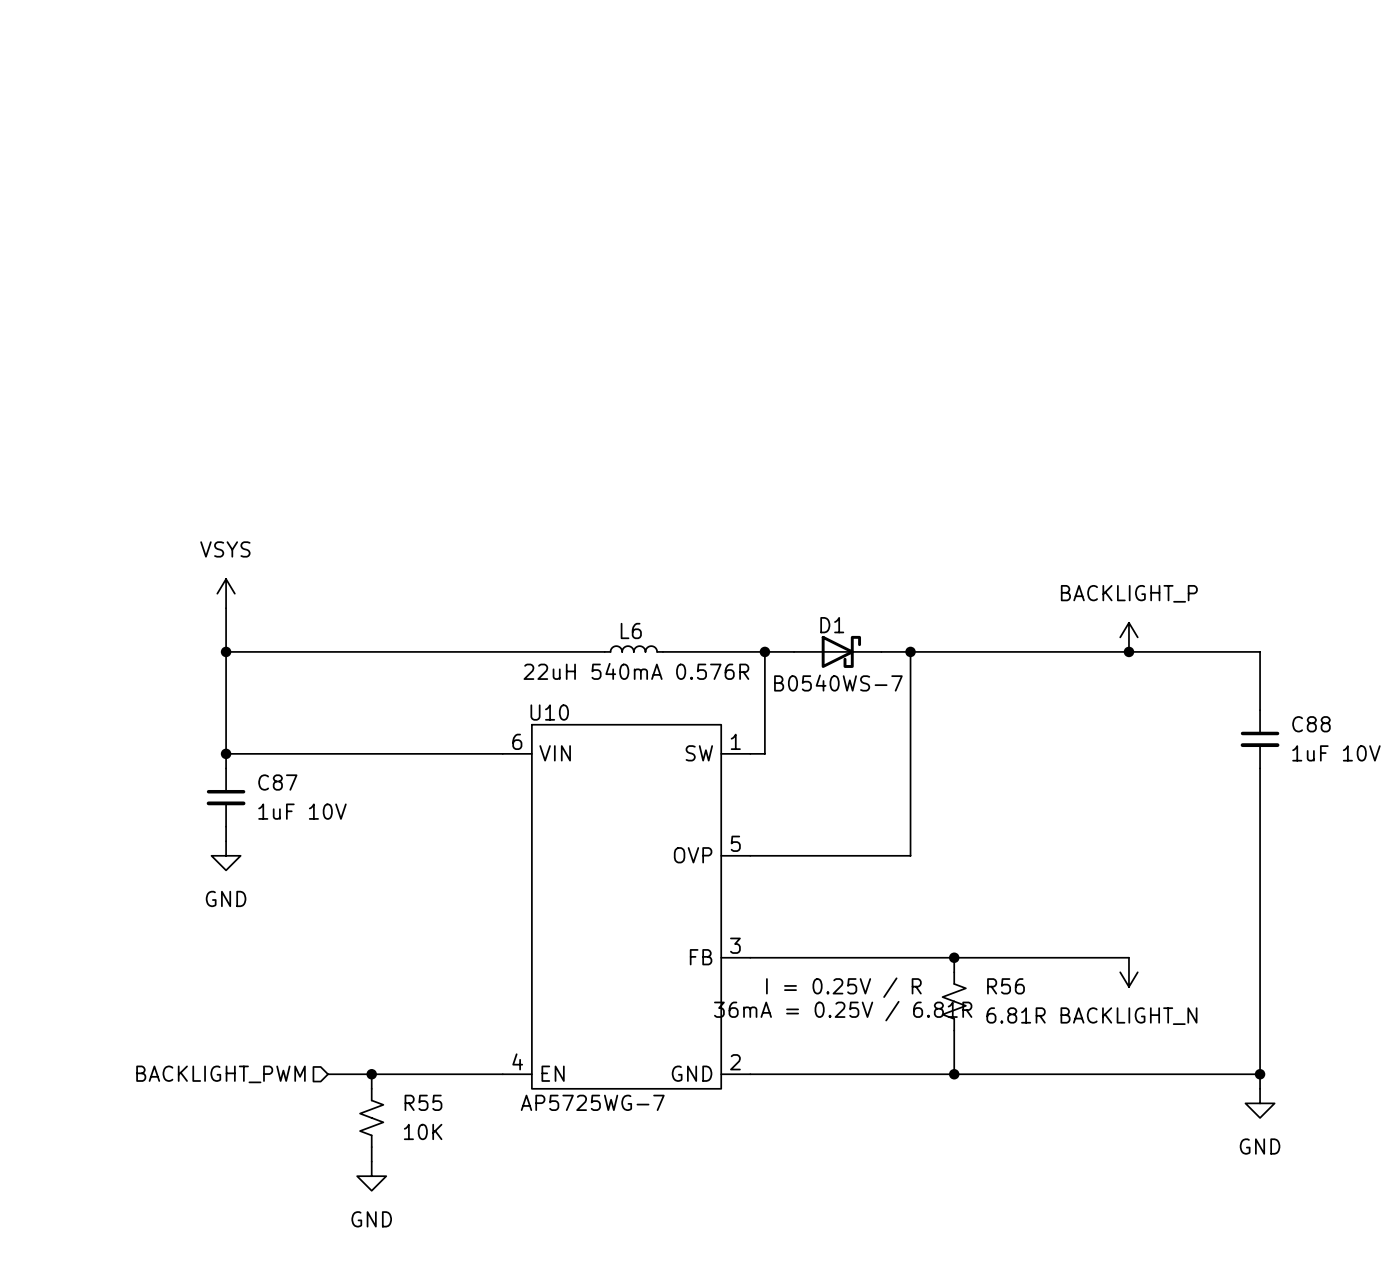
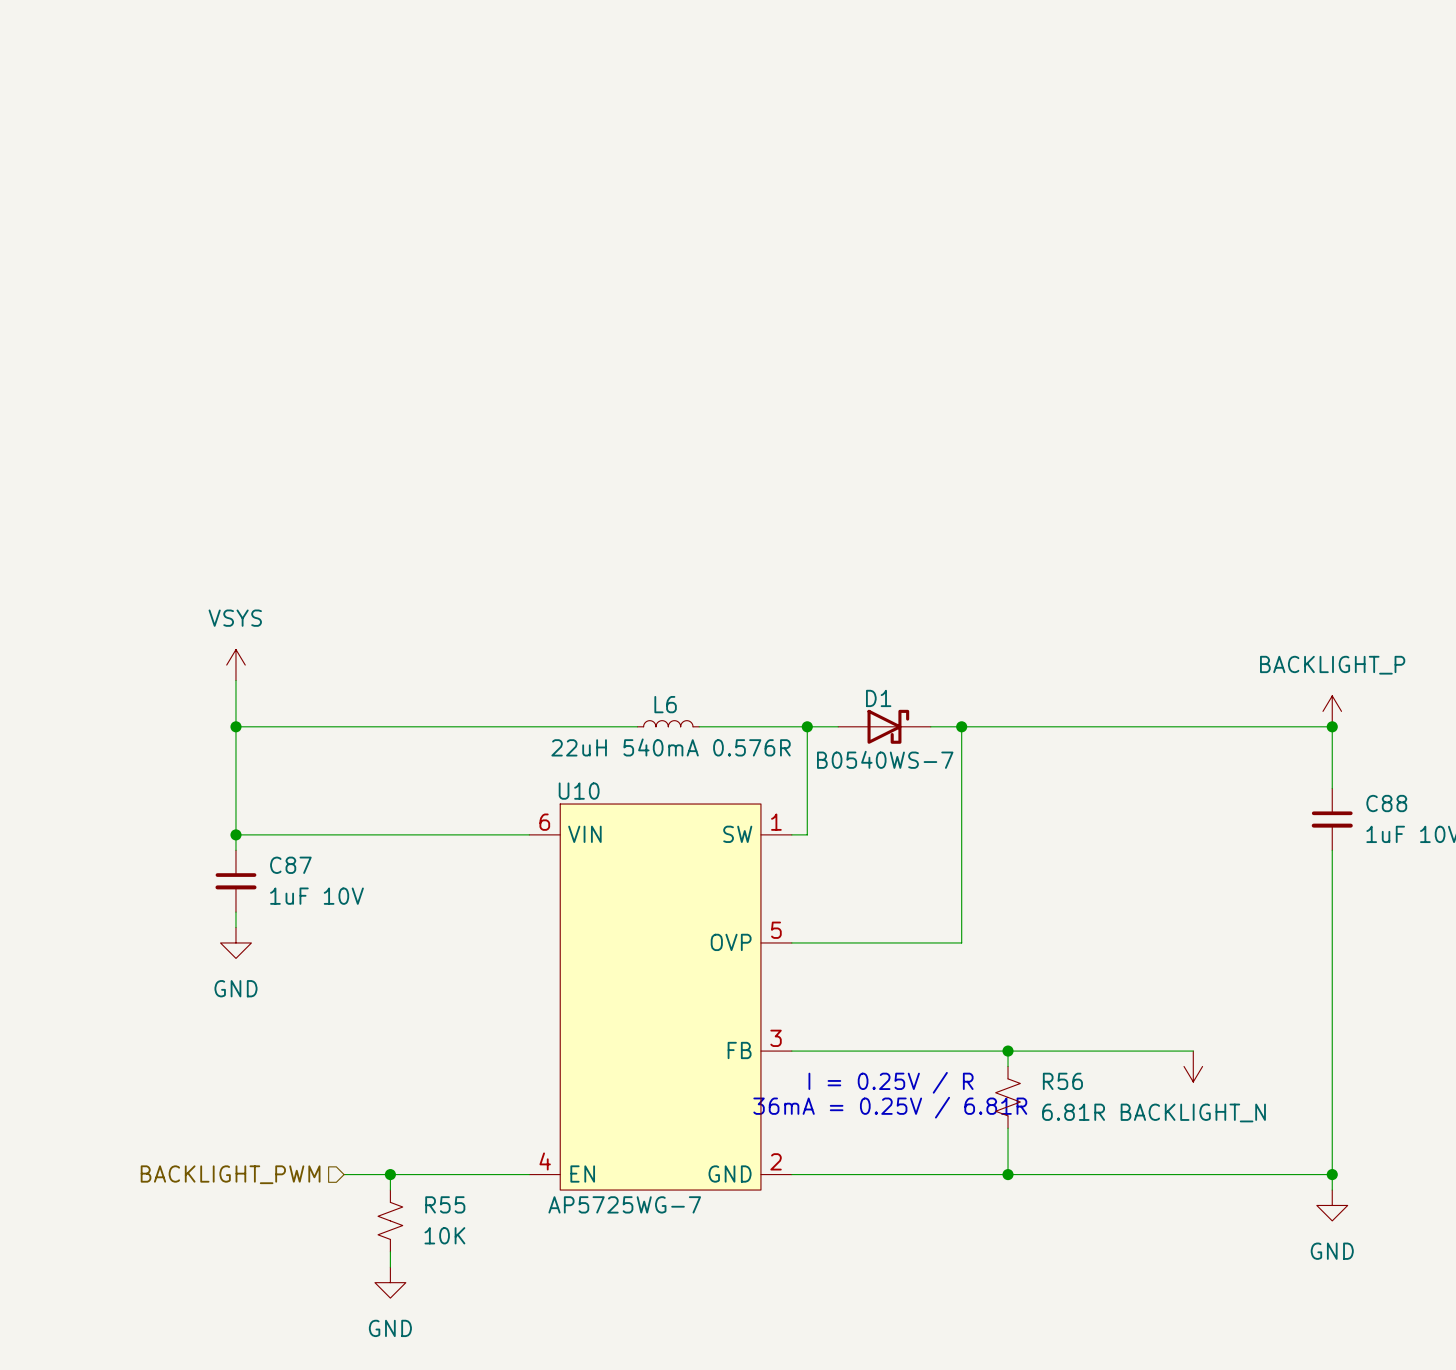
power symbol position: BACKLIGHT_P (1128, 637) -> BACKLIGHT_P (1332, 711)
junction: (1128, 651) -> none
junction: none -> (1332, 726)

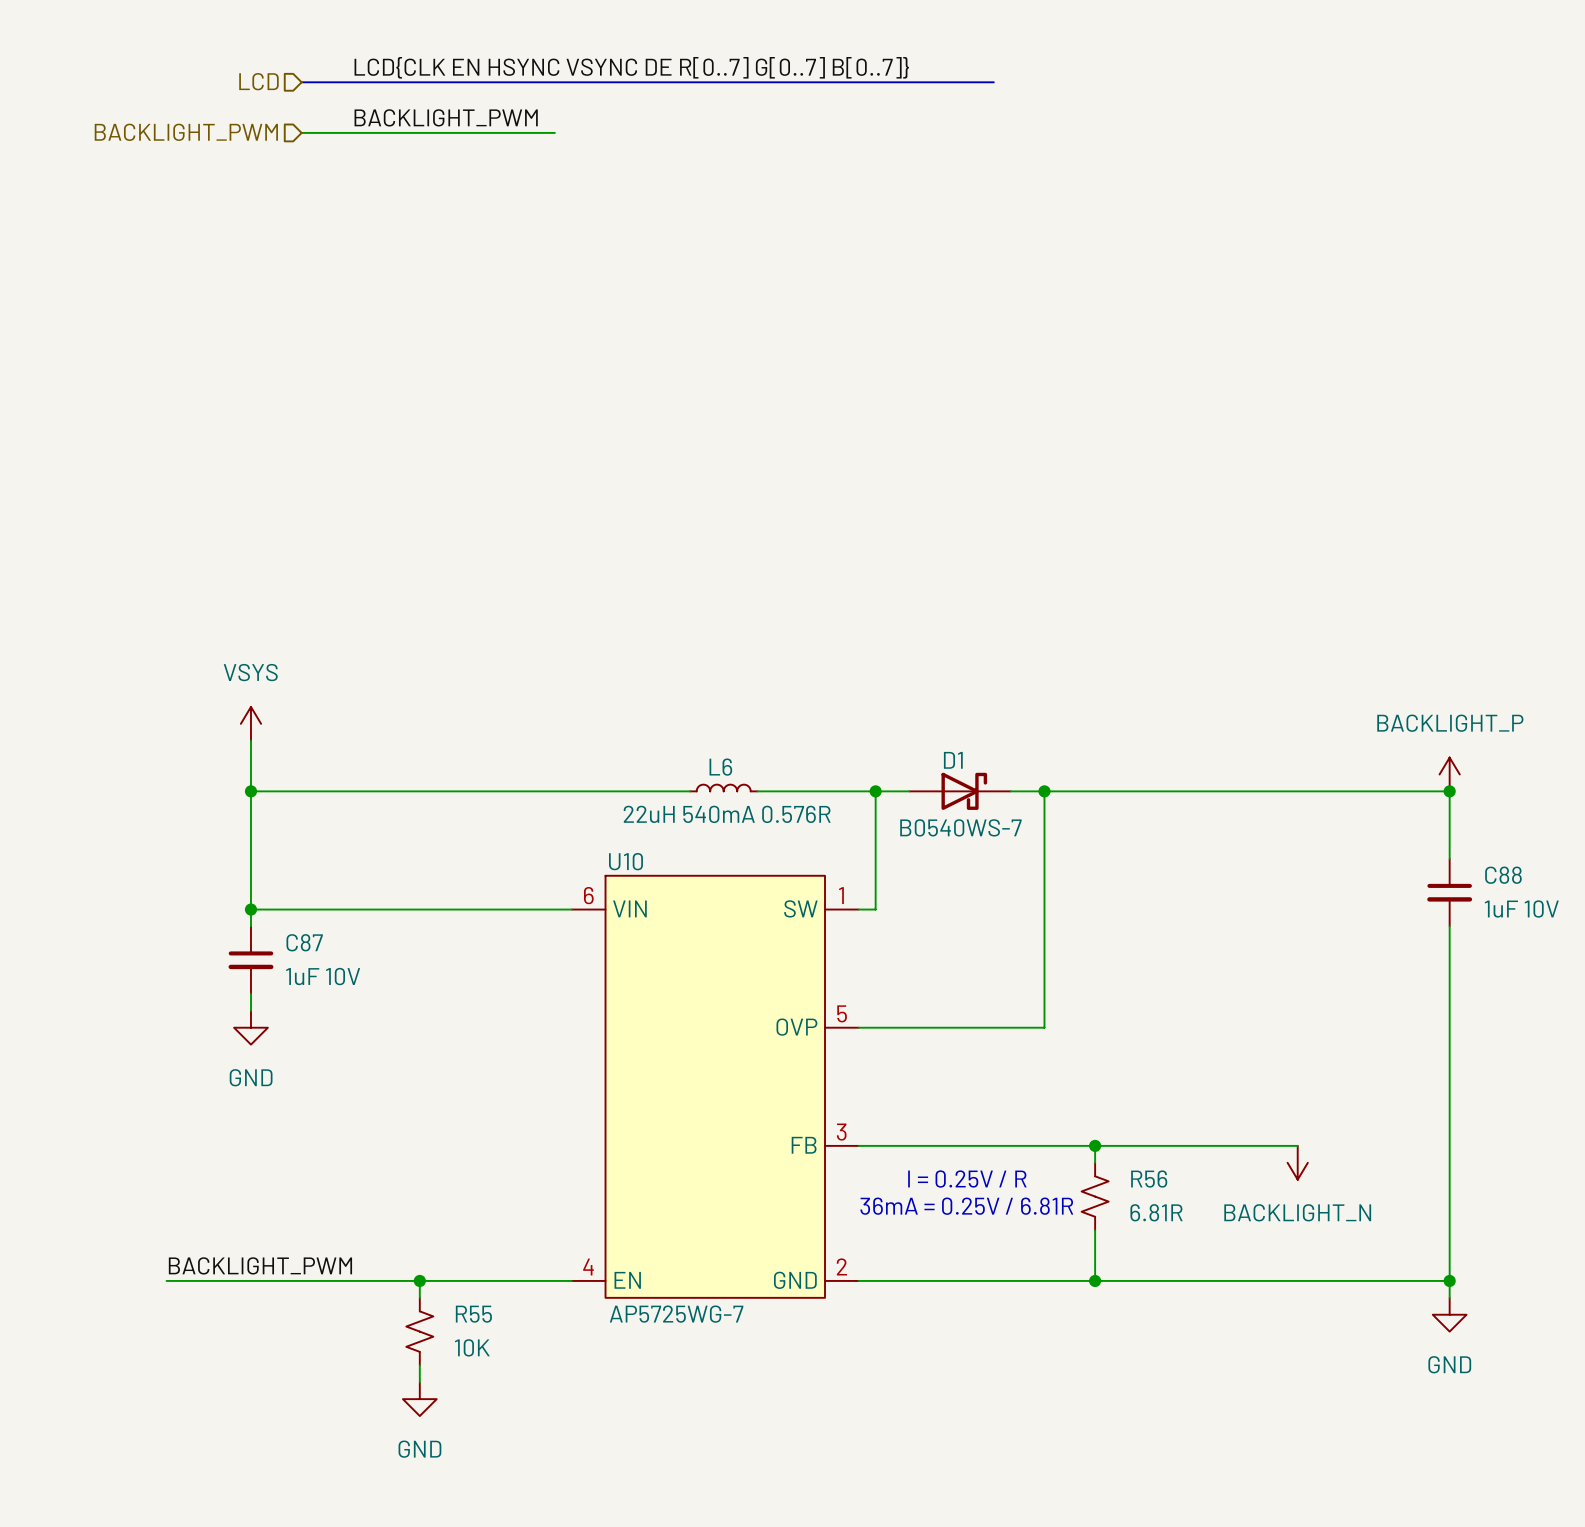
label: none -> LCD{CLK EN HSYNC VSYNC DE R[0..7] G[0..7] B[0..7]} (631, 67)
hierarchical label: none -> LCD (258, 81)
bus: none -> (301, 82) (993, 82)
label: none -> BACKLIGHT_PWM (446, 117)
hierarchical label: none -> BACKLIGHT_PWM (186, 132)
wire: none -> (301, 132) (554, 132)
label: none -> BACKLIGHT_PWM (260, 1265)
wire: none -> (166, 1280) (369, 1280)
hierarchical label: BACKLIGHT_PWM (230, 1174) -> none

